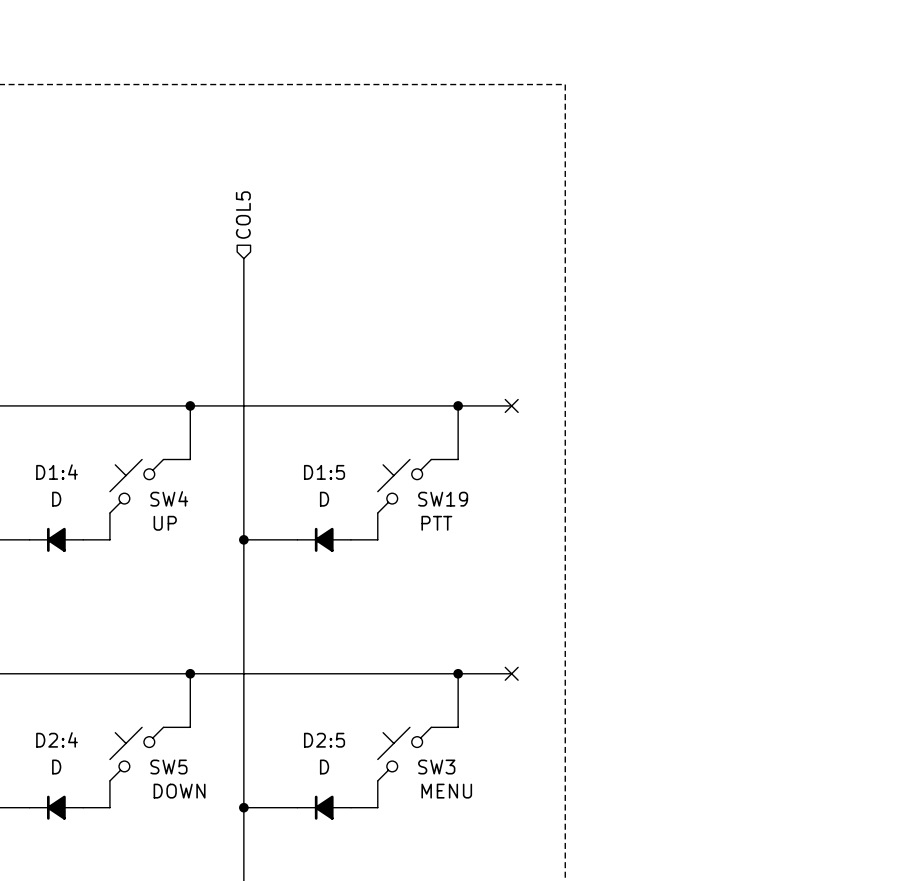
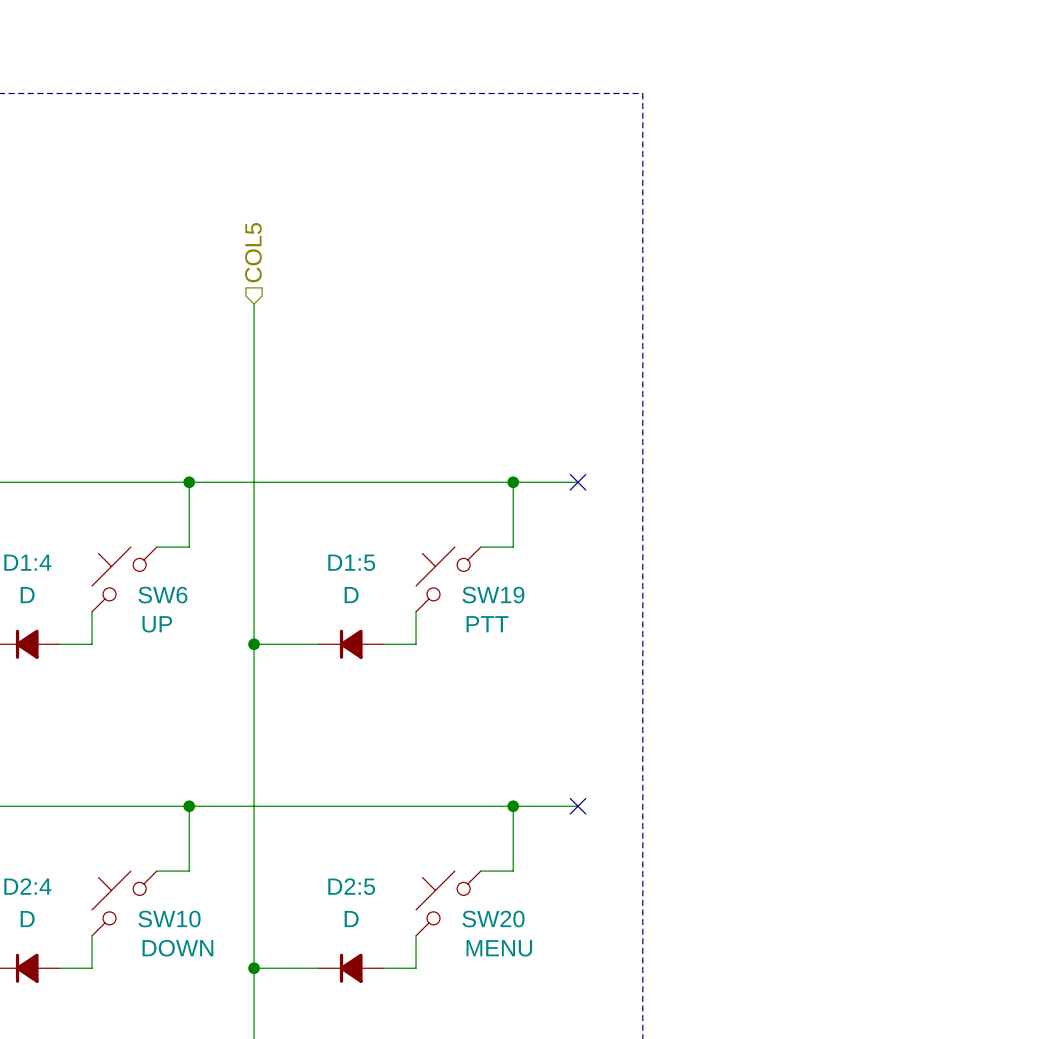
SW4 name: SW4 (169, 498) -> SW6 (162, 595)
SW5 name: SW5 (168, 767) -> SW10 (169, 919)
SW3 name: SW3 (436, 767) -> SW20 (493, 919)

